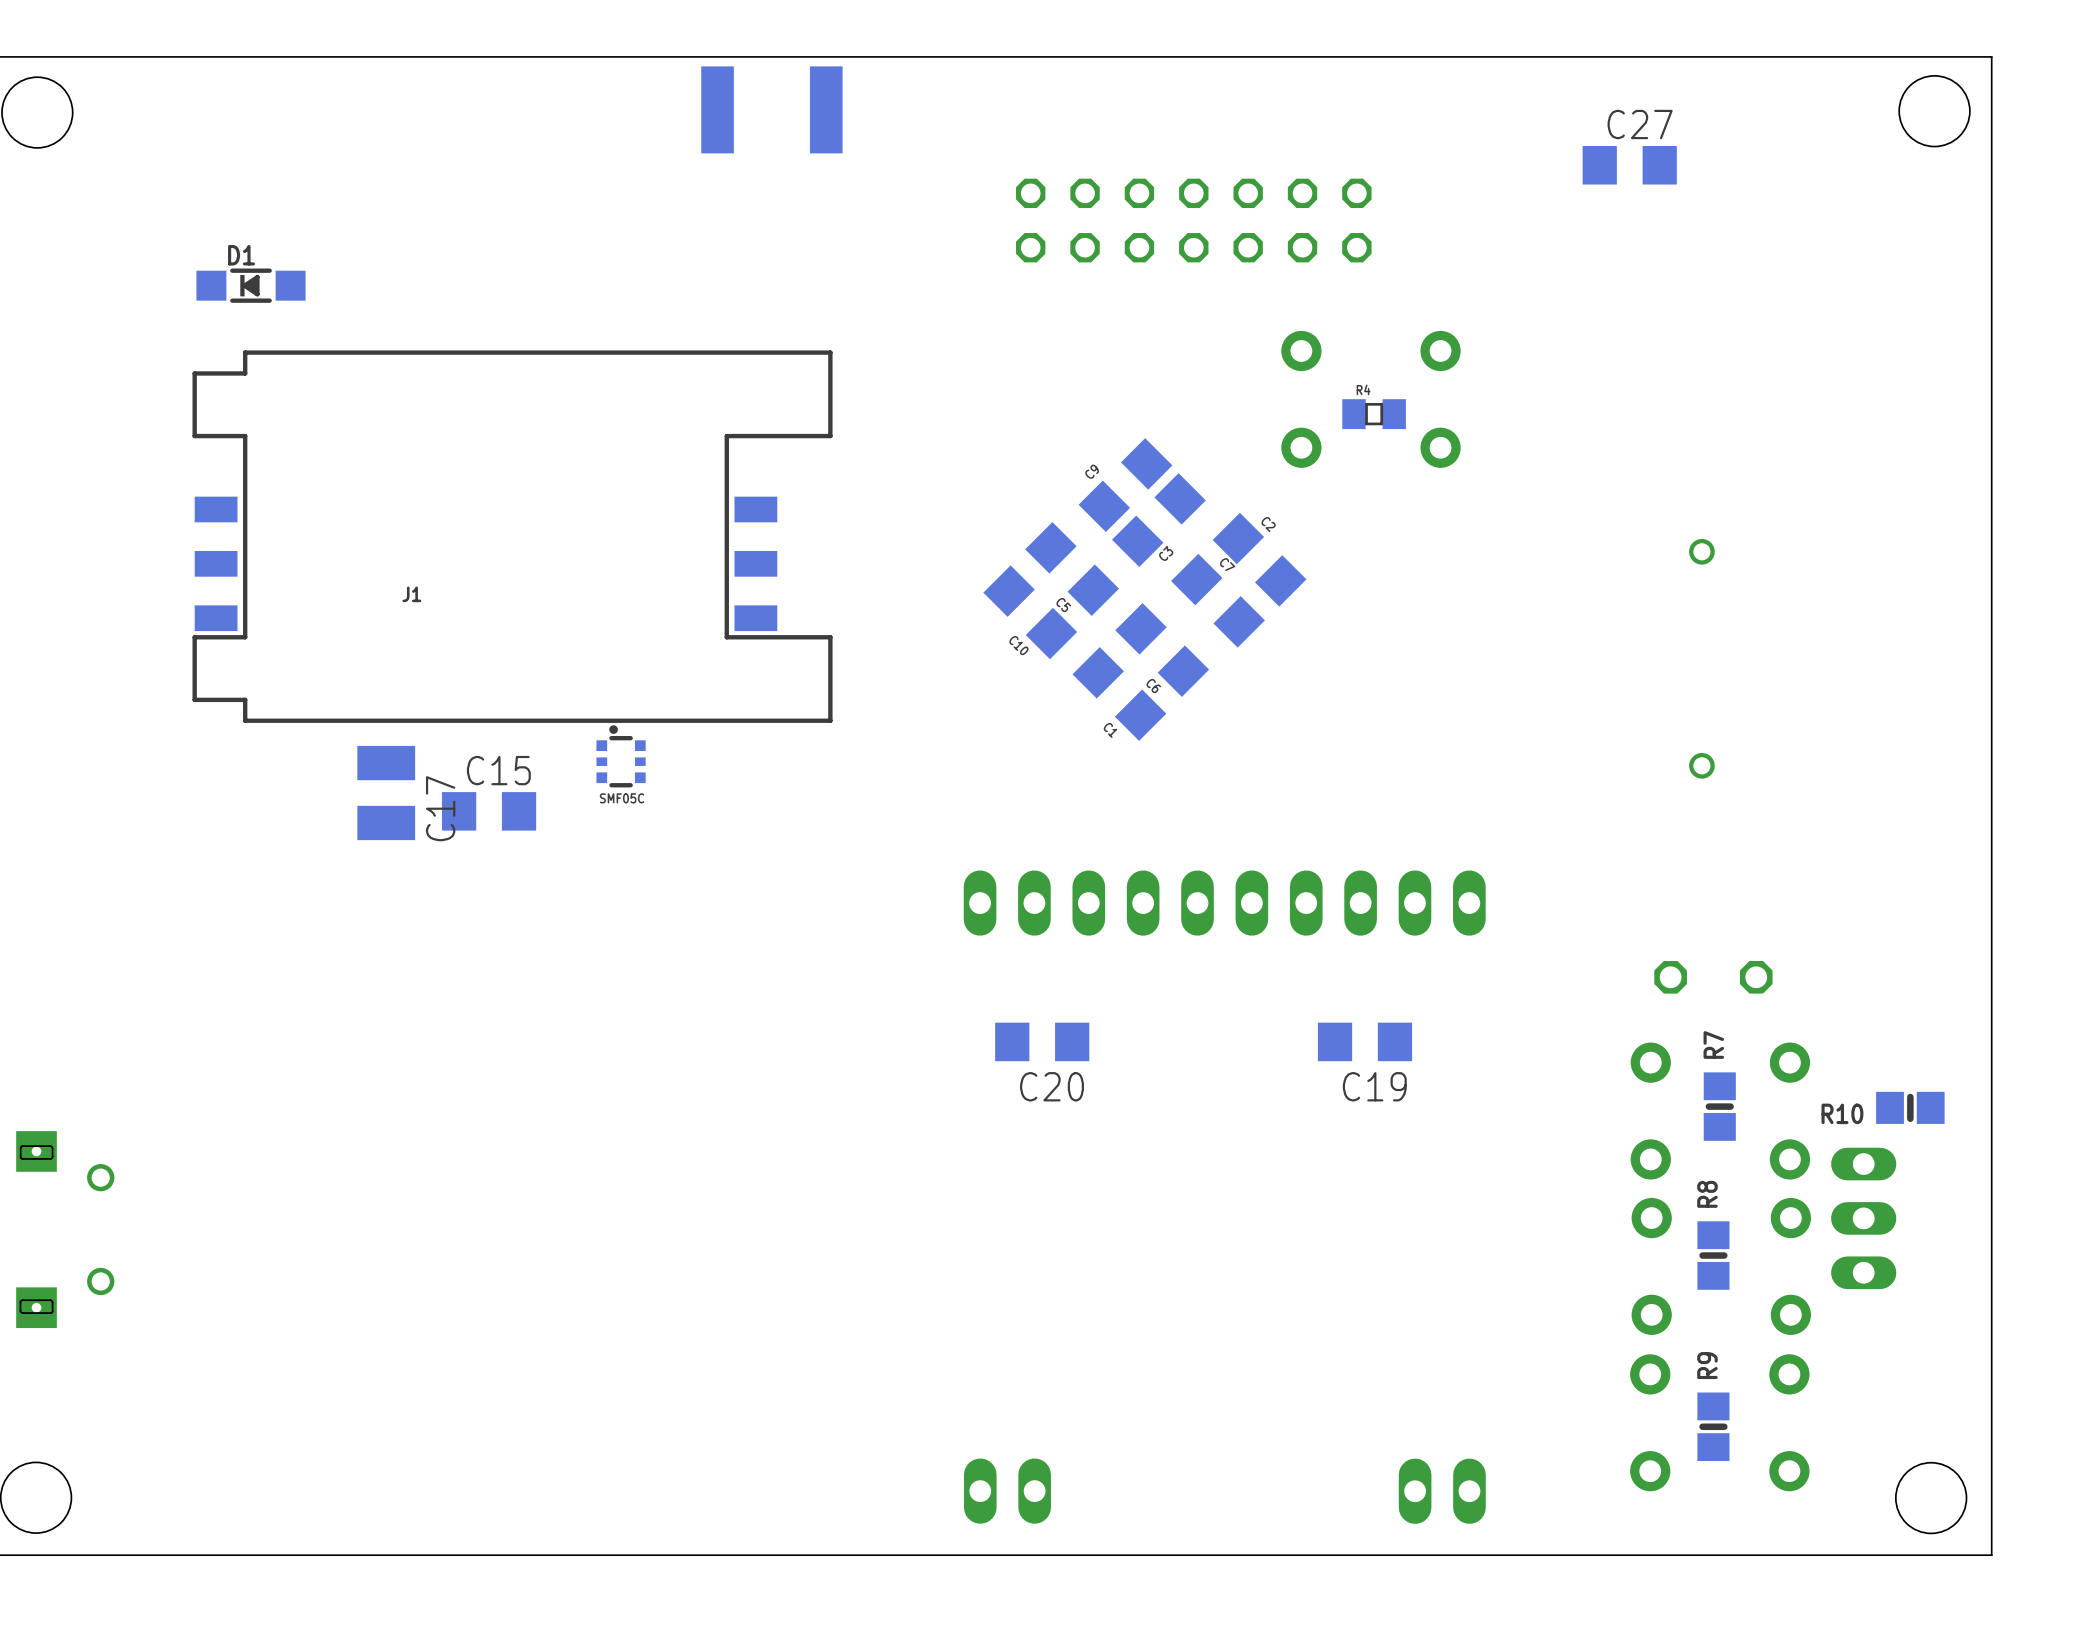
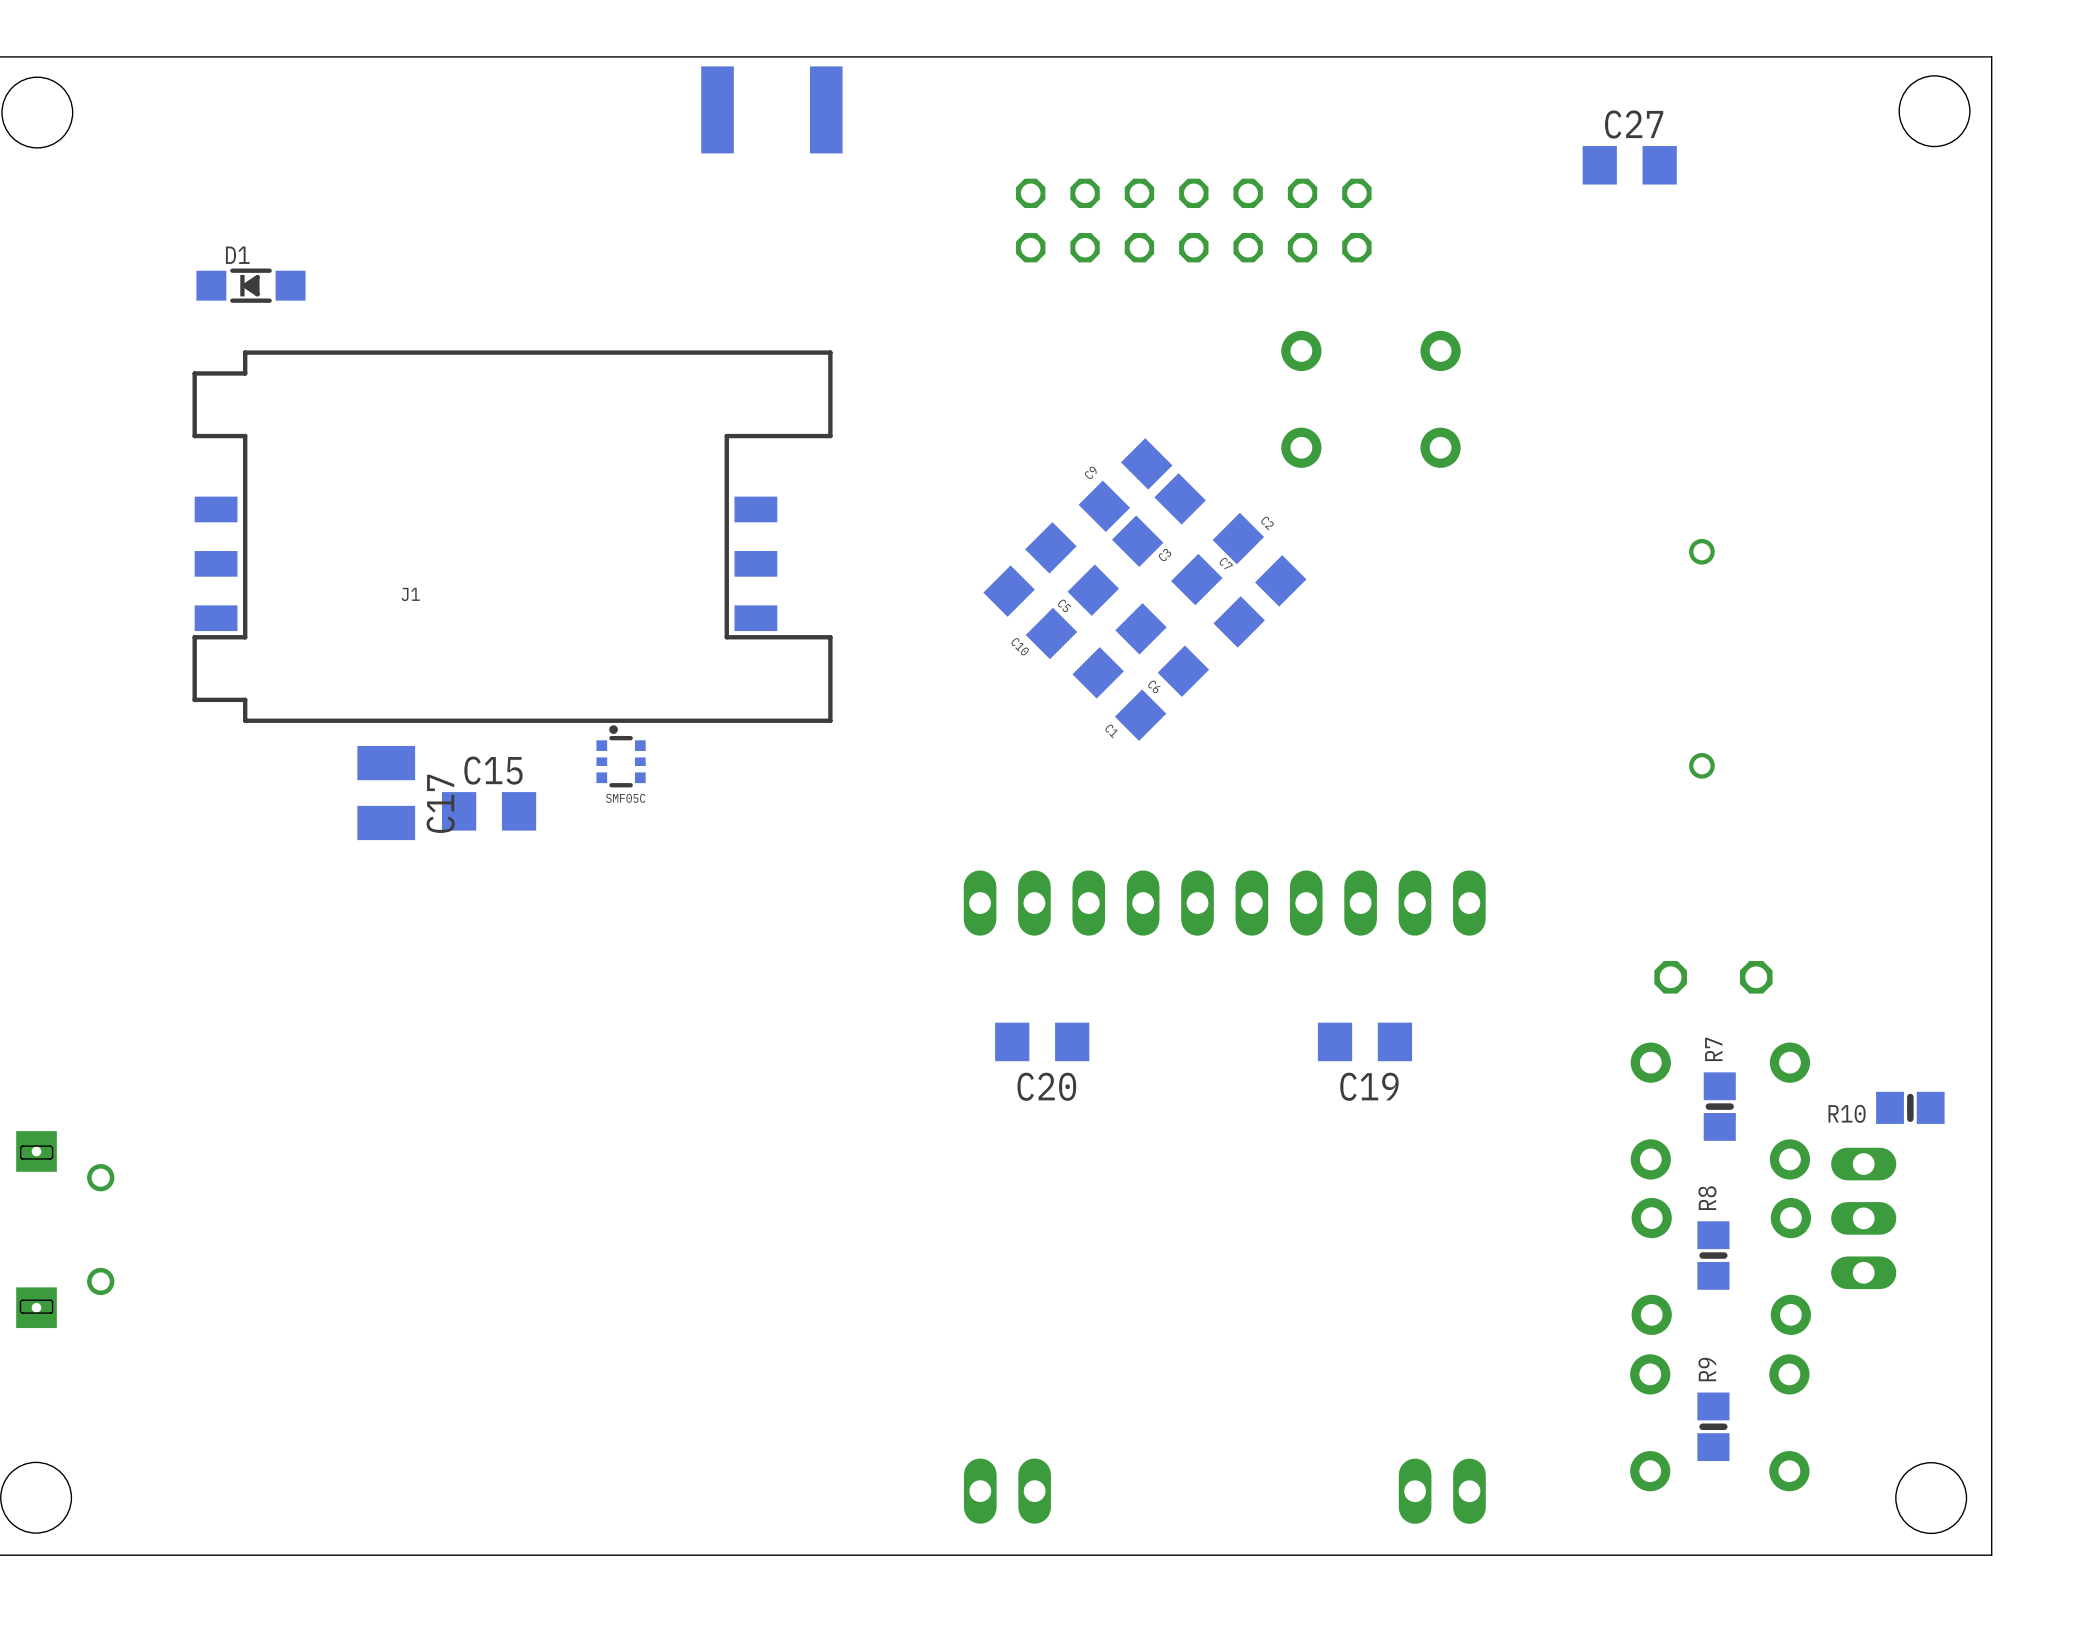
R4: (1374, 414) -> none

